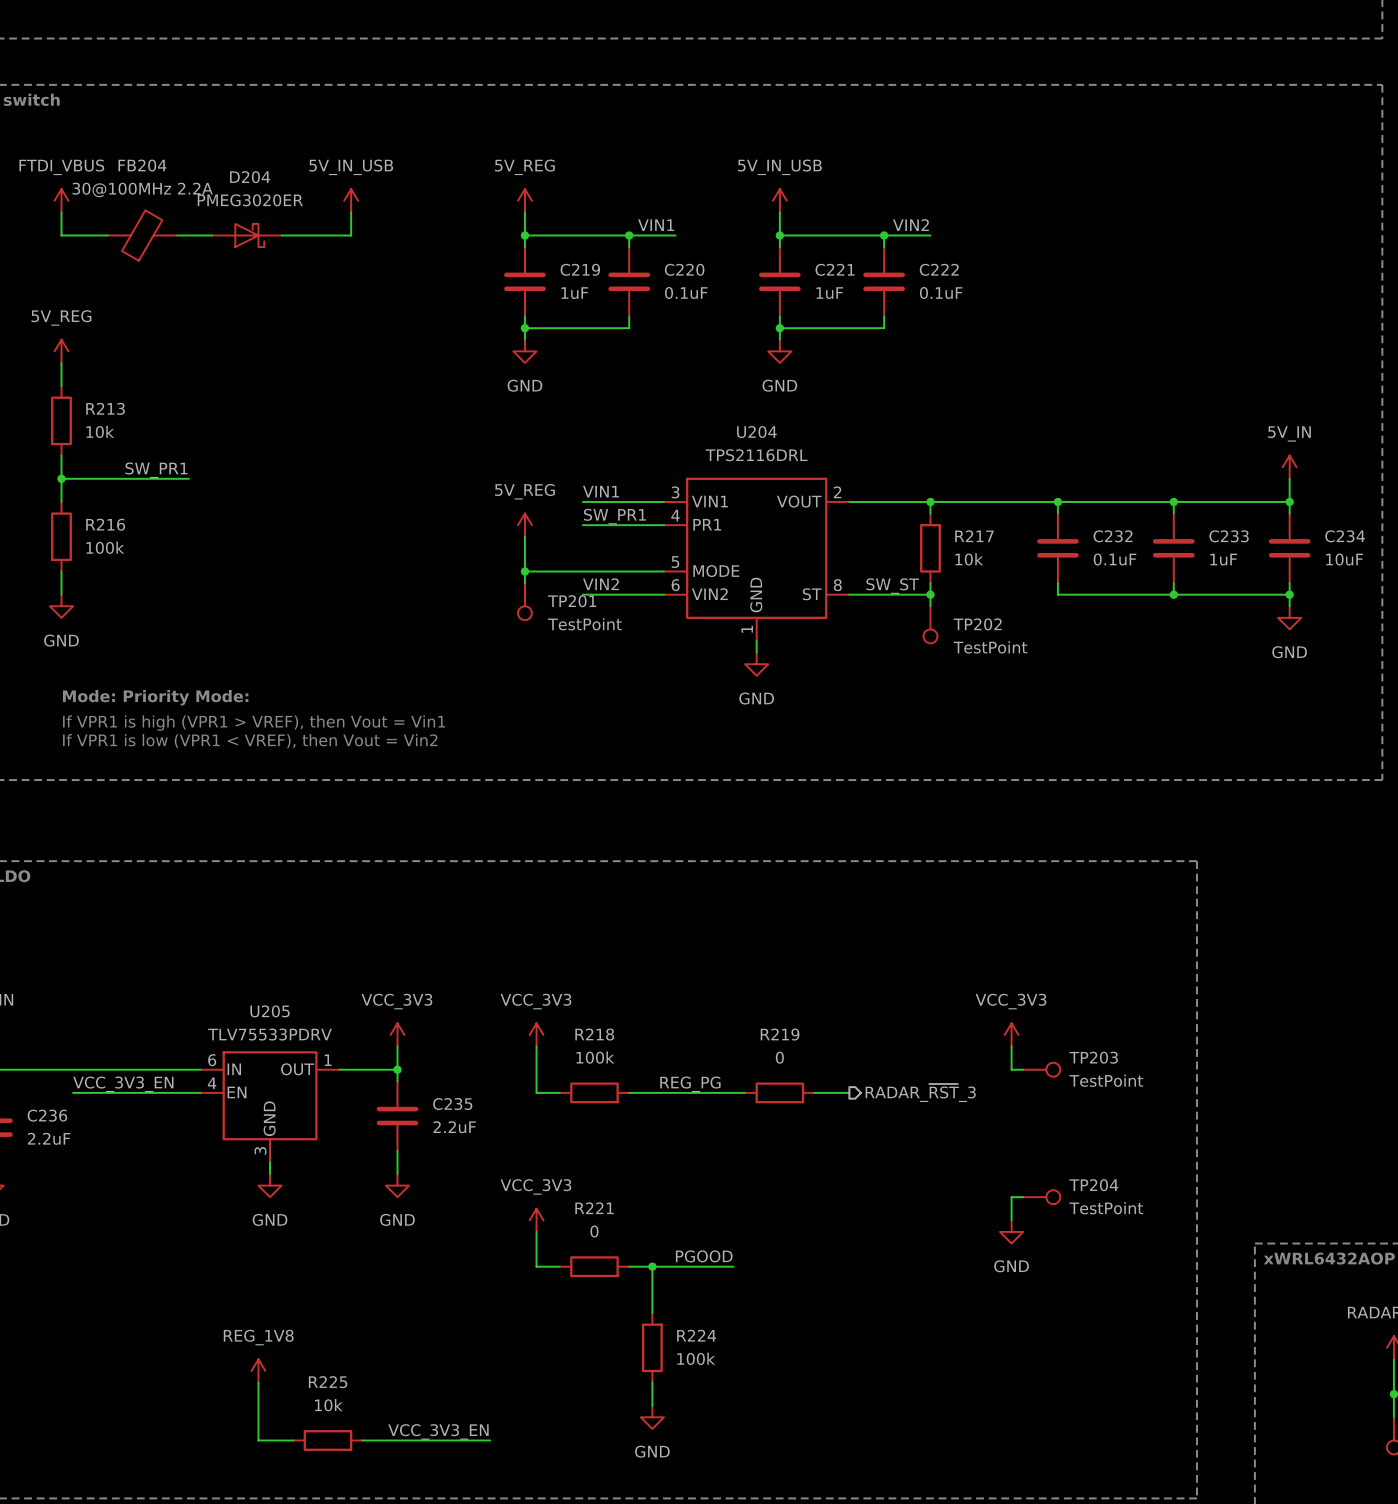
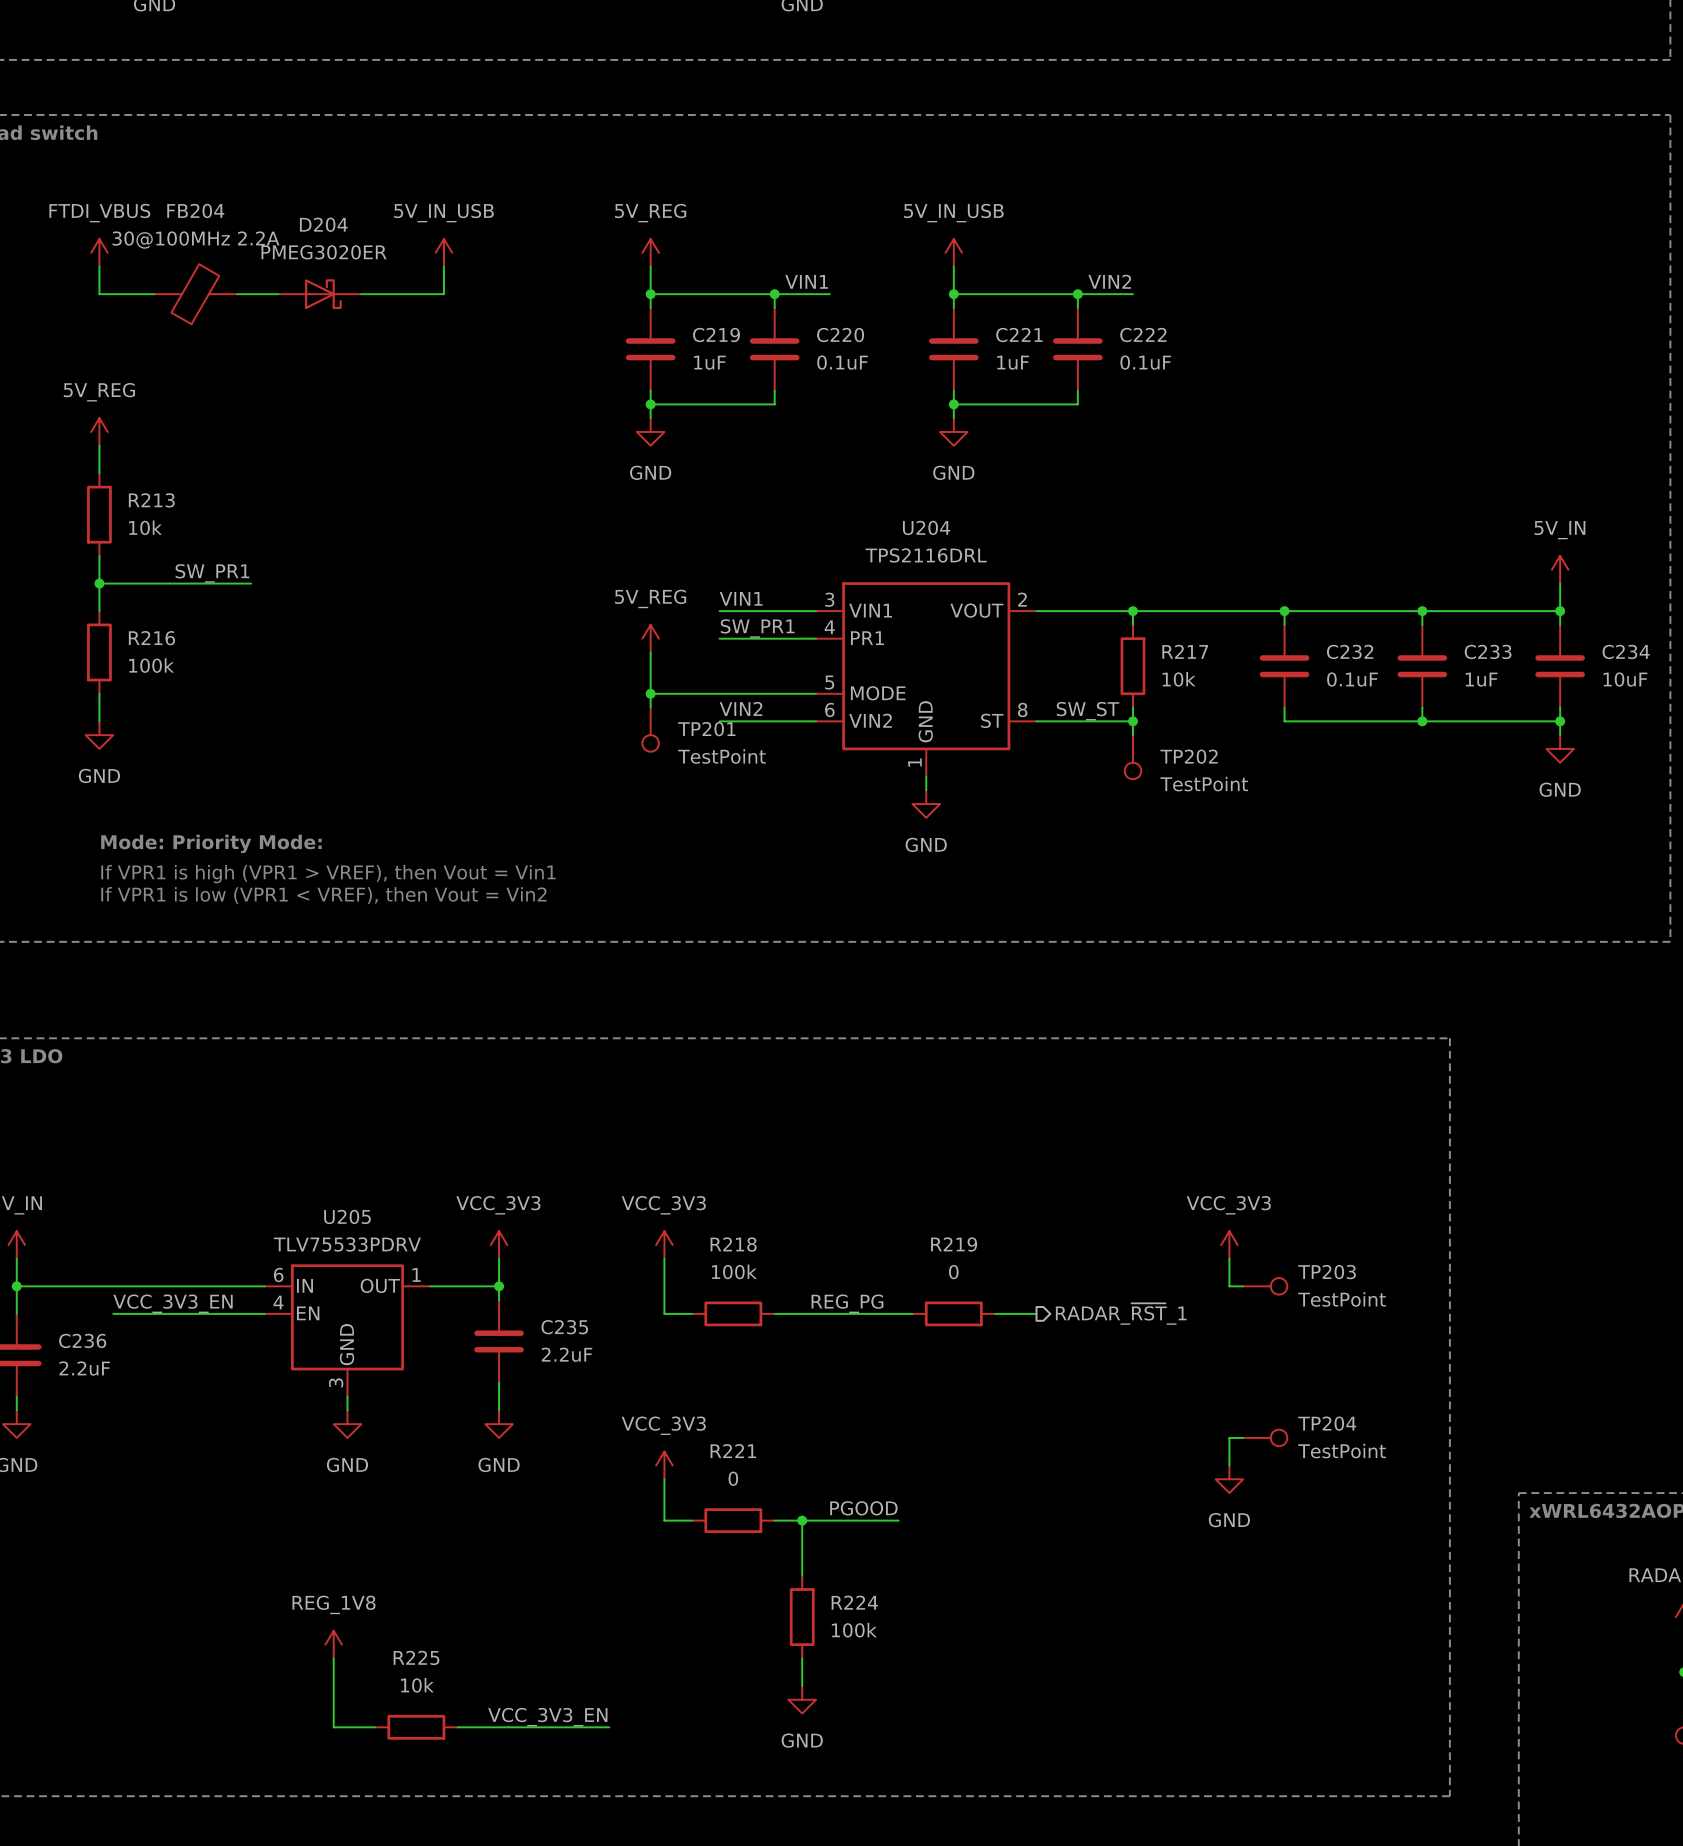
hierarchical label: RADAR_~{RST}_3 (920, 1093) -> RADAR_~{RST}_1 (1121, 1314)

